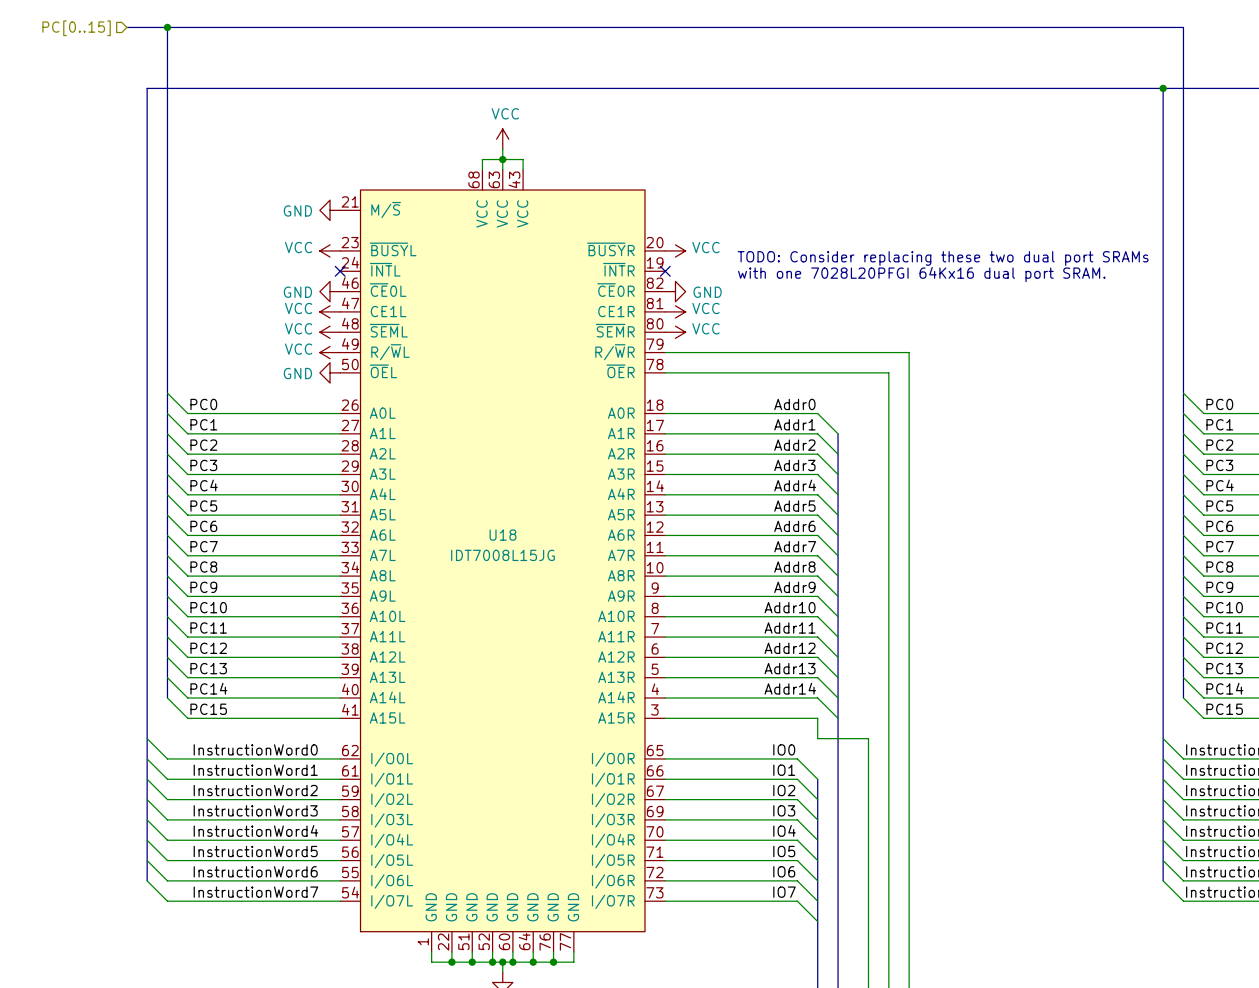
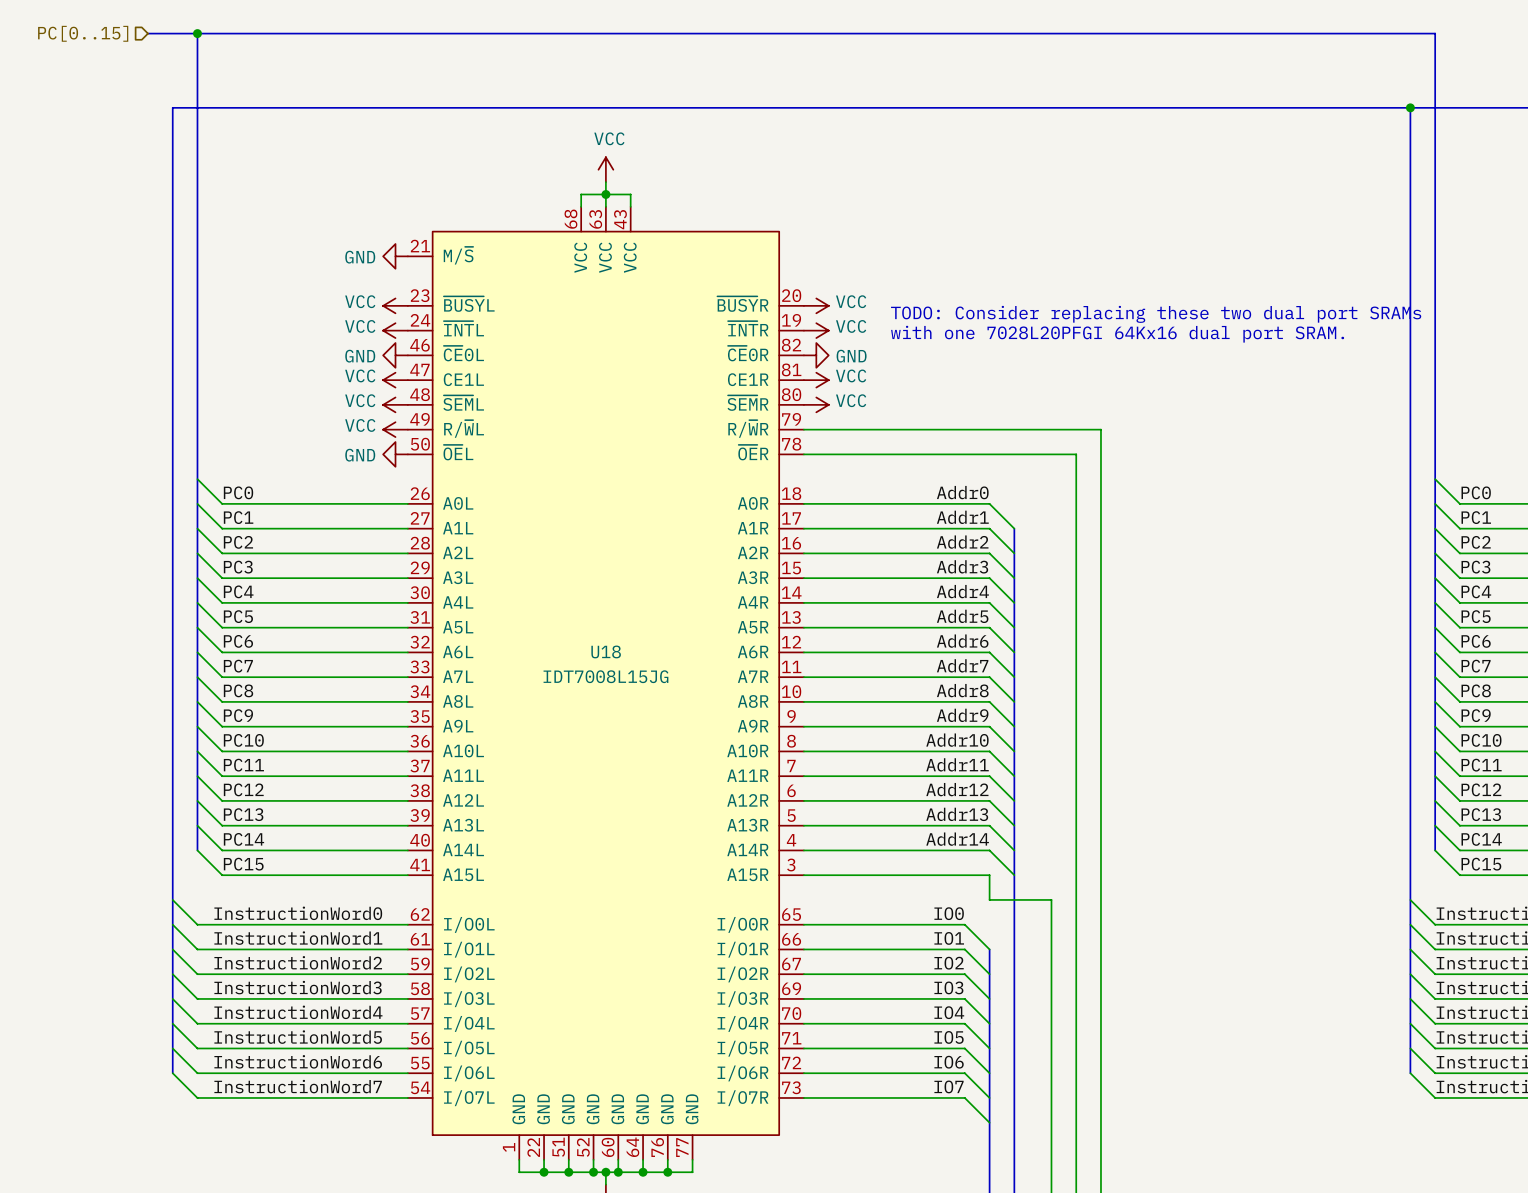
power symbol: none -> VCC (395, 330)
no-connect mark: (340, 271) -> none
no-connect mark: (665, 271) -> none
power symbol: none -> VCC (816, 330)

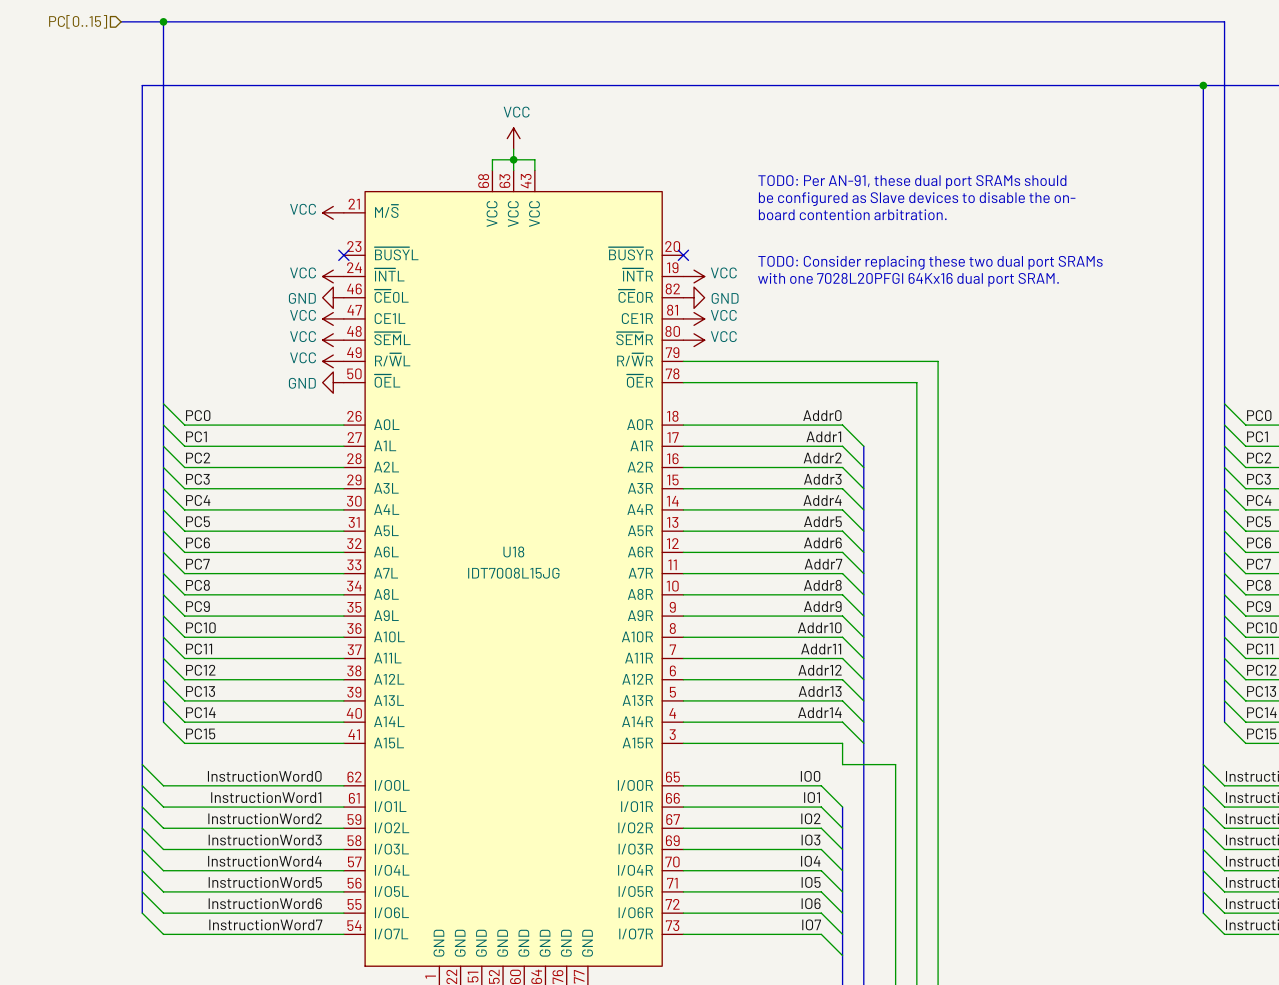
text: none -> TODO: Per AN-91, these dual port SRAMs should (912, 182)
text: none -> be configured as Slave devices to disable the on- (917, 199)
power symbol: GND (395, 256) -> VCC (333, 212)
text: none -> board contention arbitration. (852, 214)
power symbol: VCC (395, 305) -> none
no-connect mark: none -> (343, 255)
no-connect mark: none -> (683, 255)
power symbol: VCC (816, 305) -> none

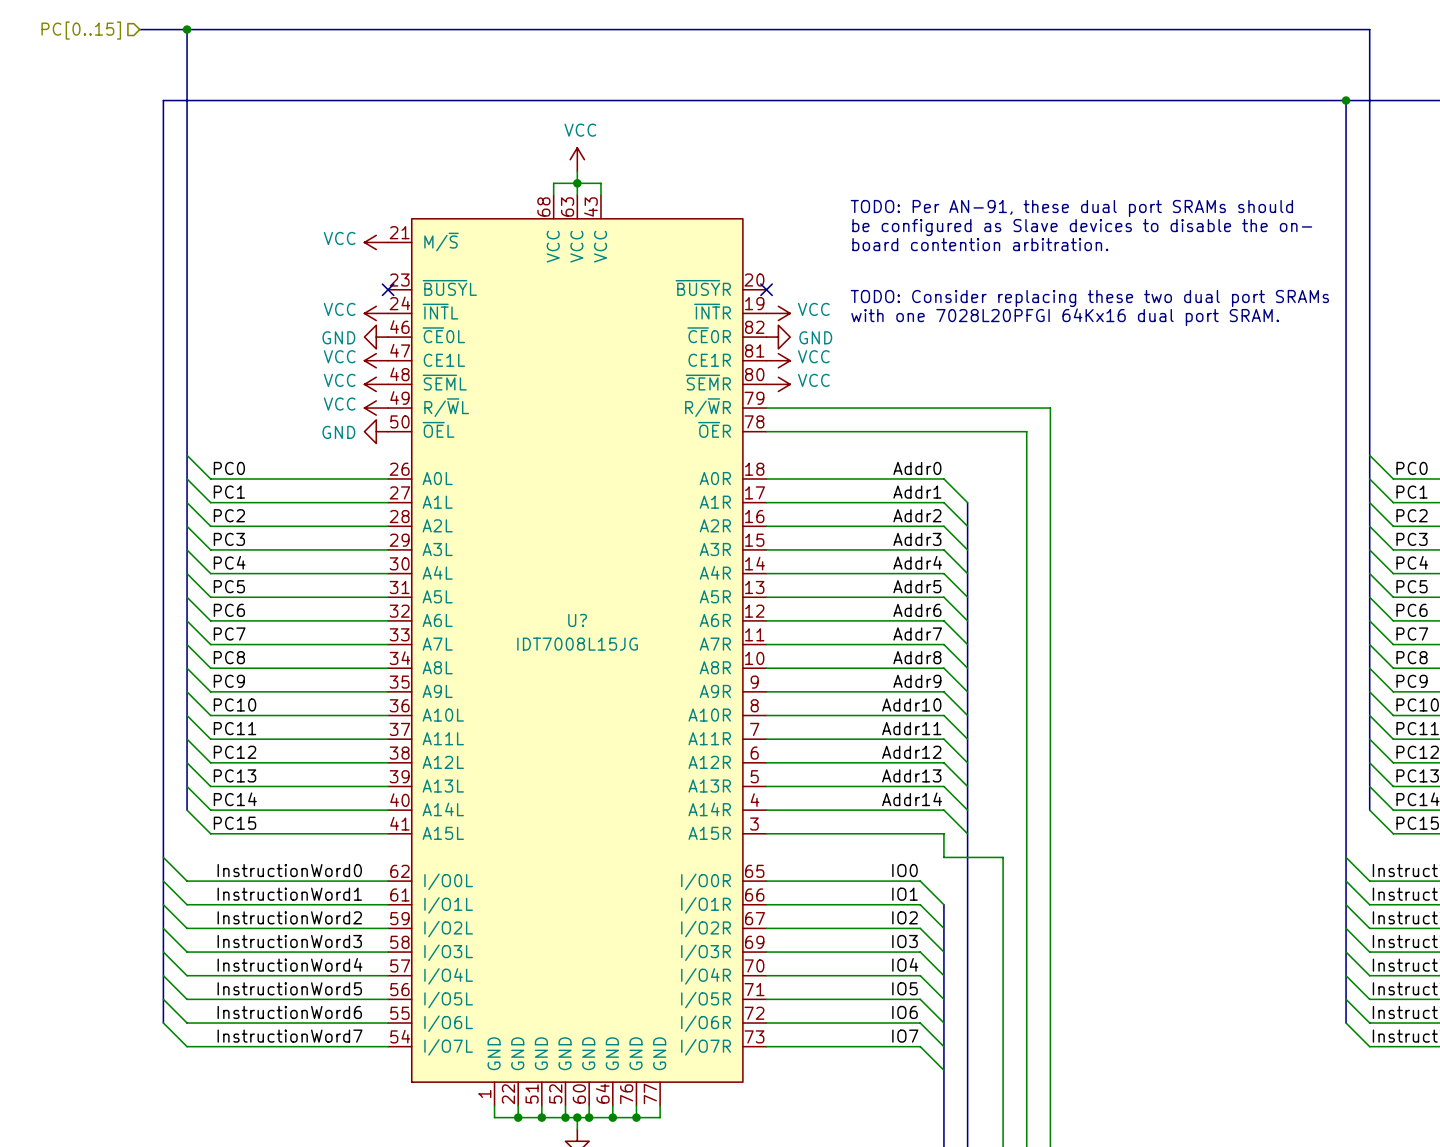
U18 name: U18 (513, 551) -> U? (577, 620)

